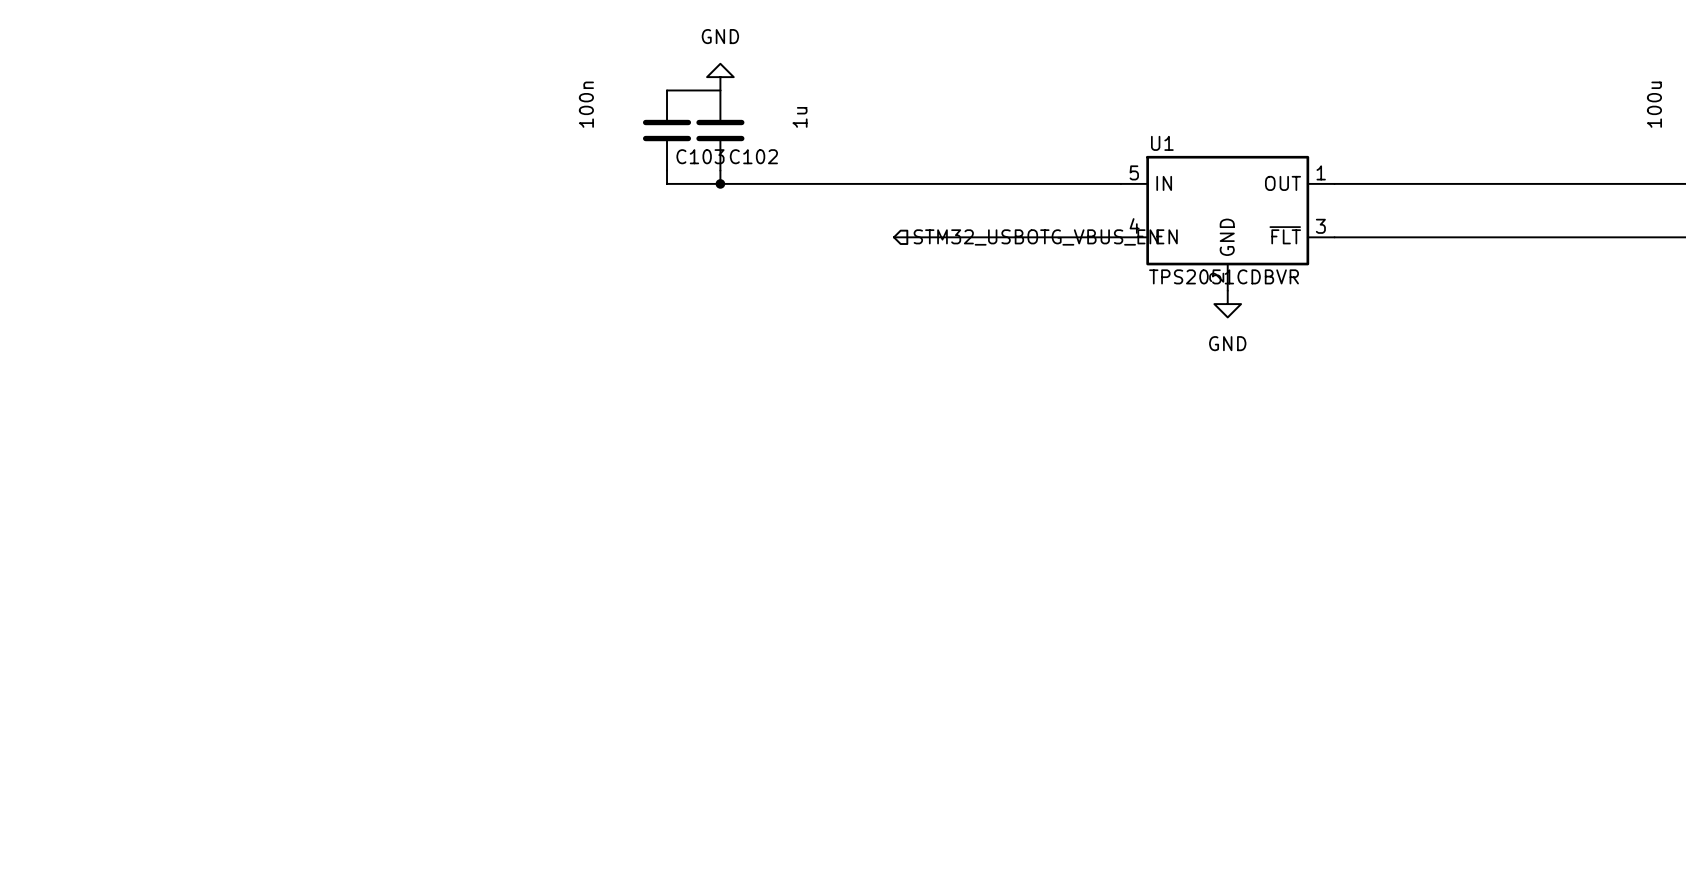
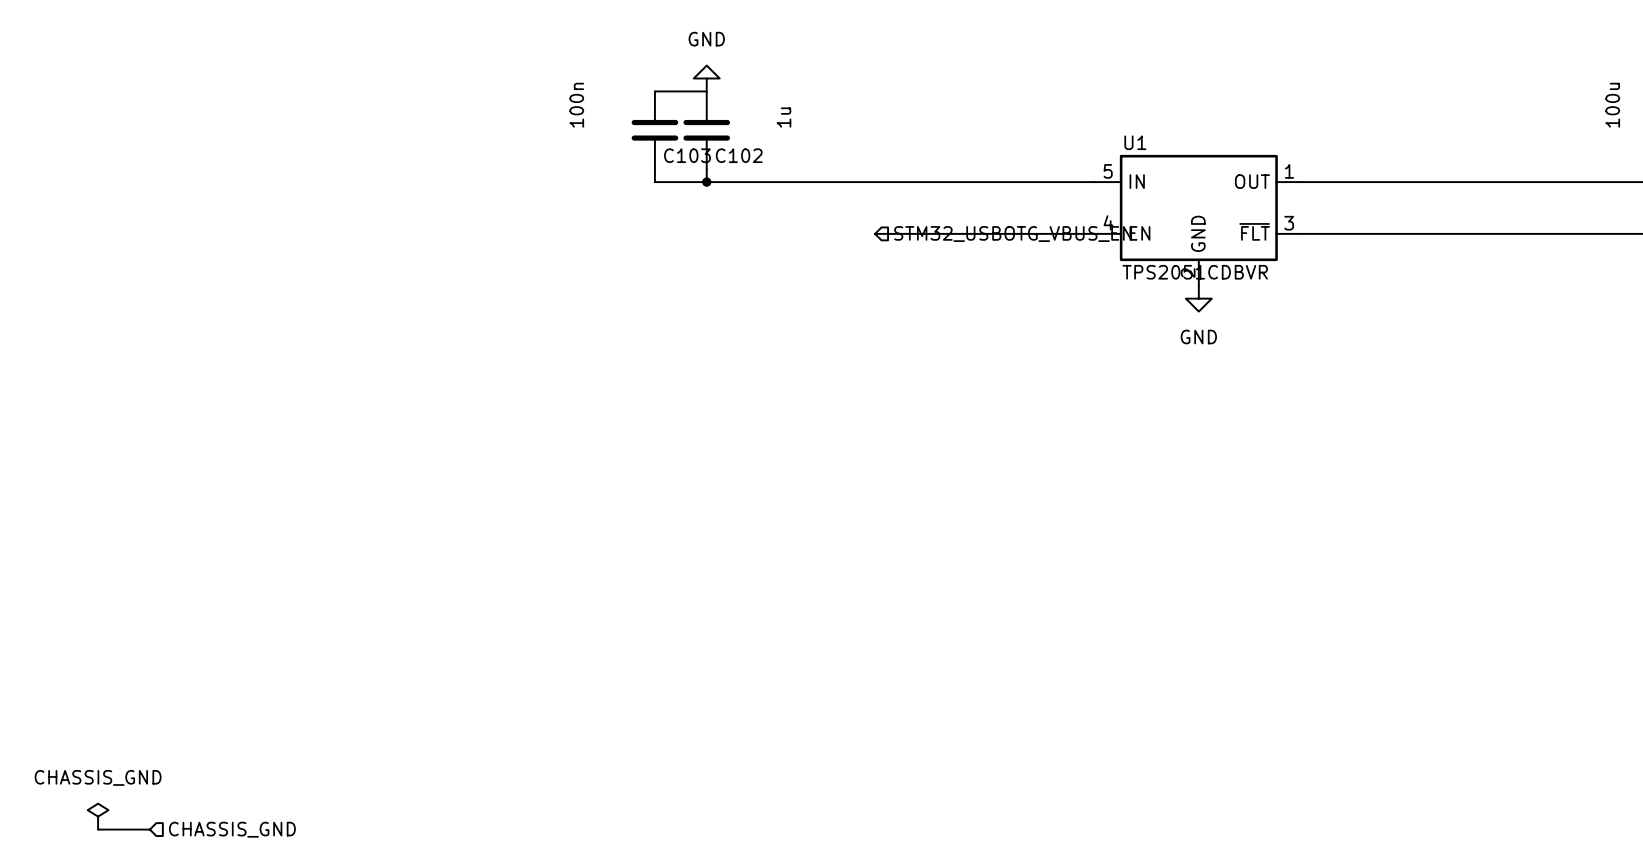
power symbol: none -> CHASSIS_GND (98, 816)
wire: none -> (98, 829) (149, 829)
hierarchical label: none -> CHASSIS_GND (232, 829)

